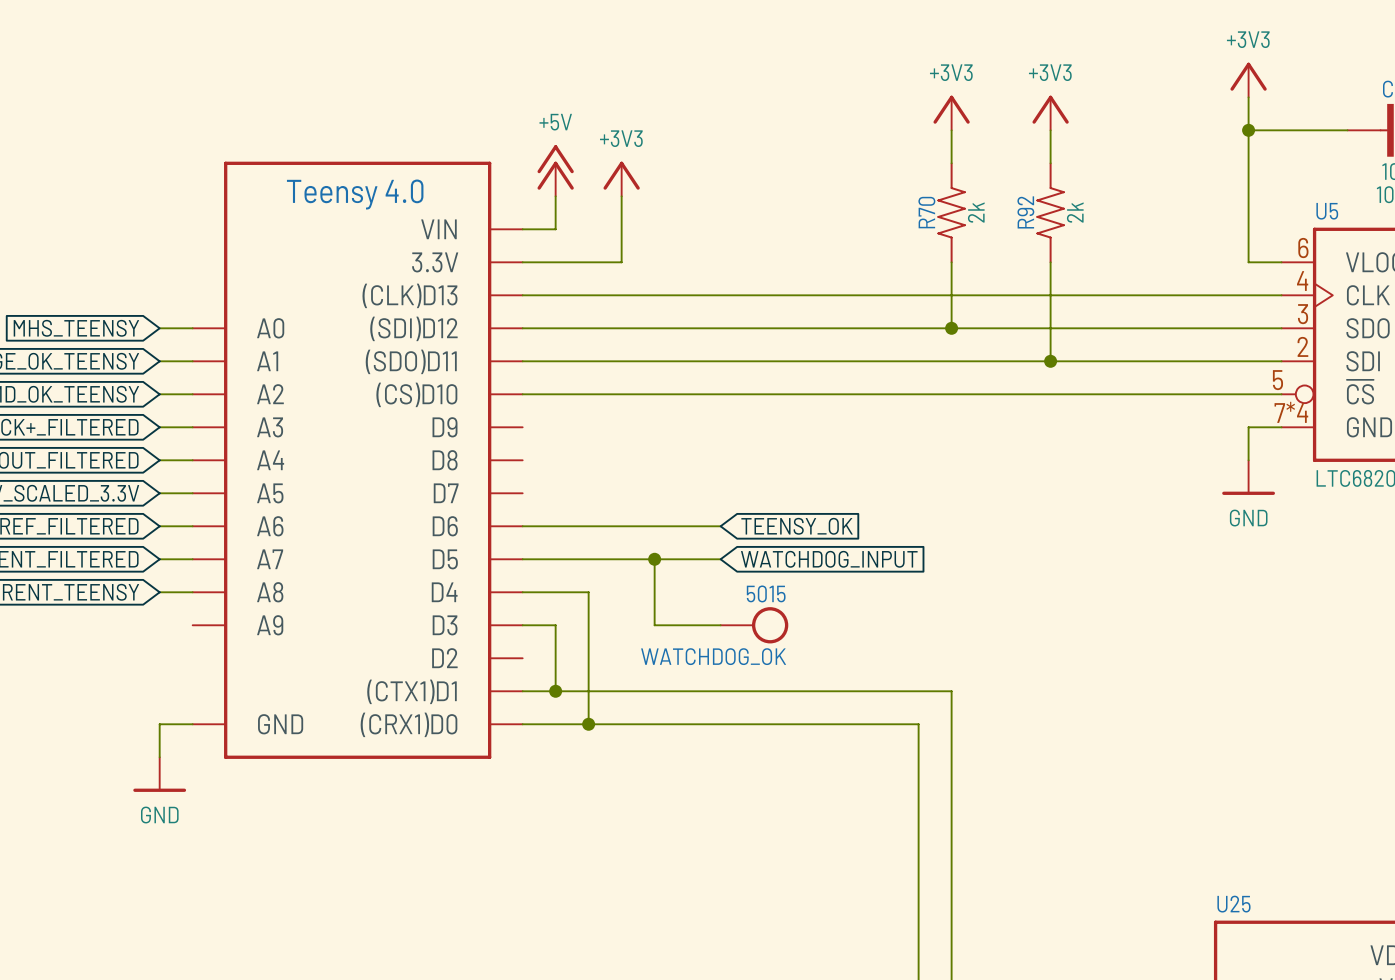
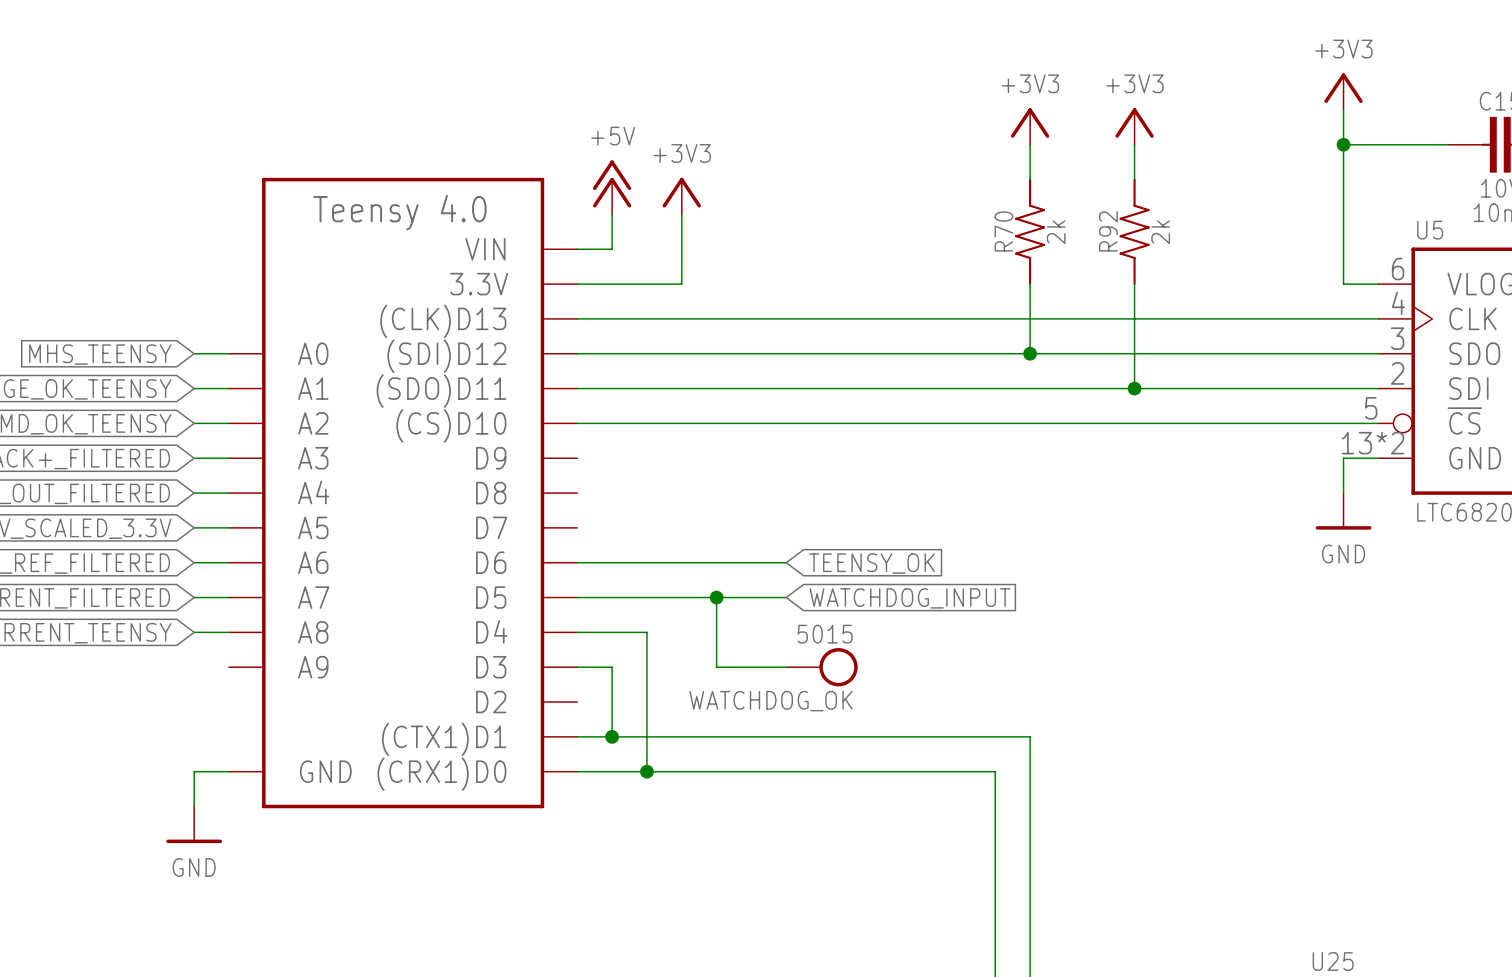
U5 pin number: 7*4 (1291, 412) -> 13*2 (1372, 443)

